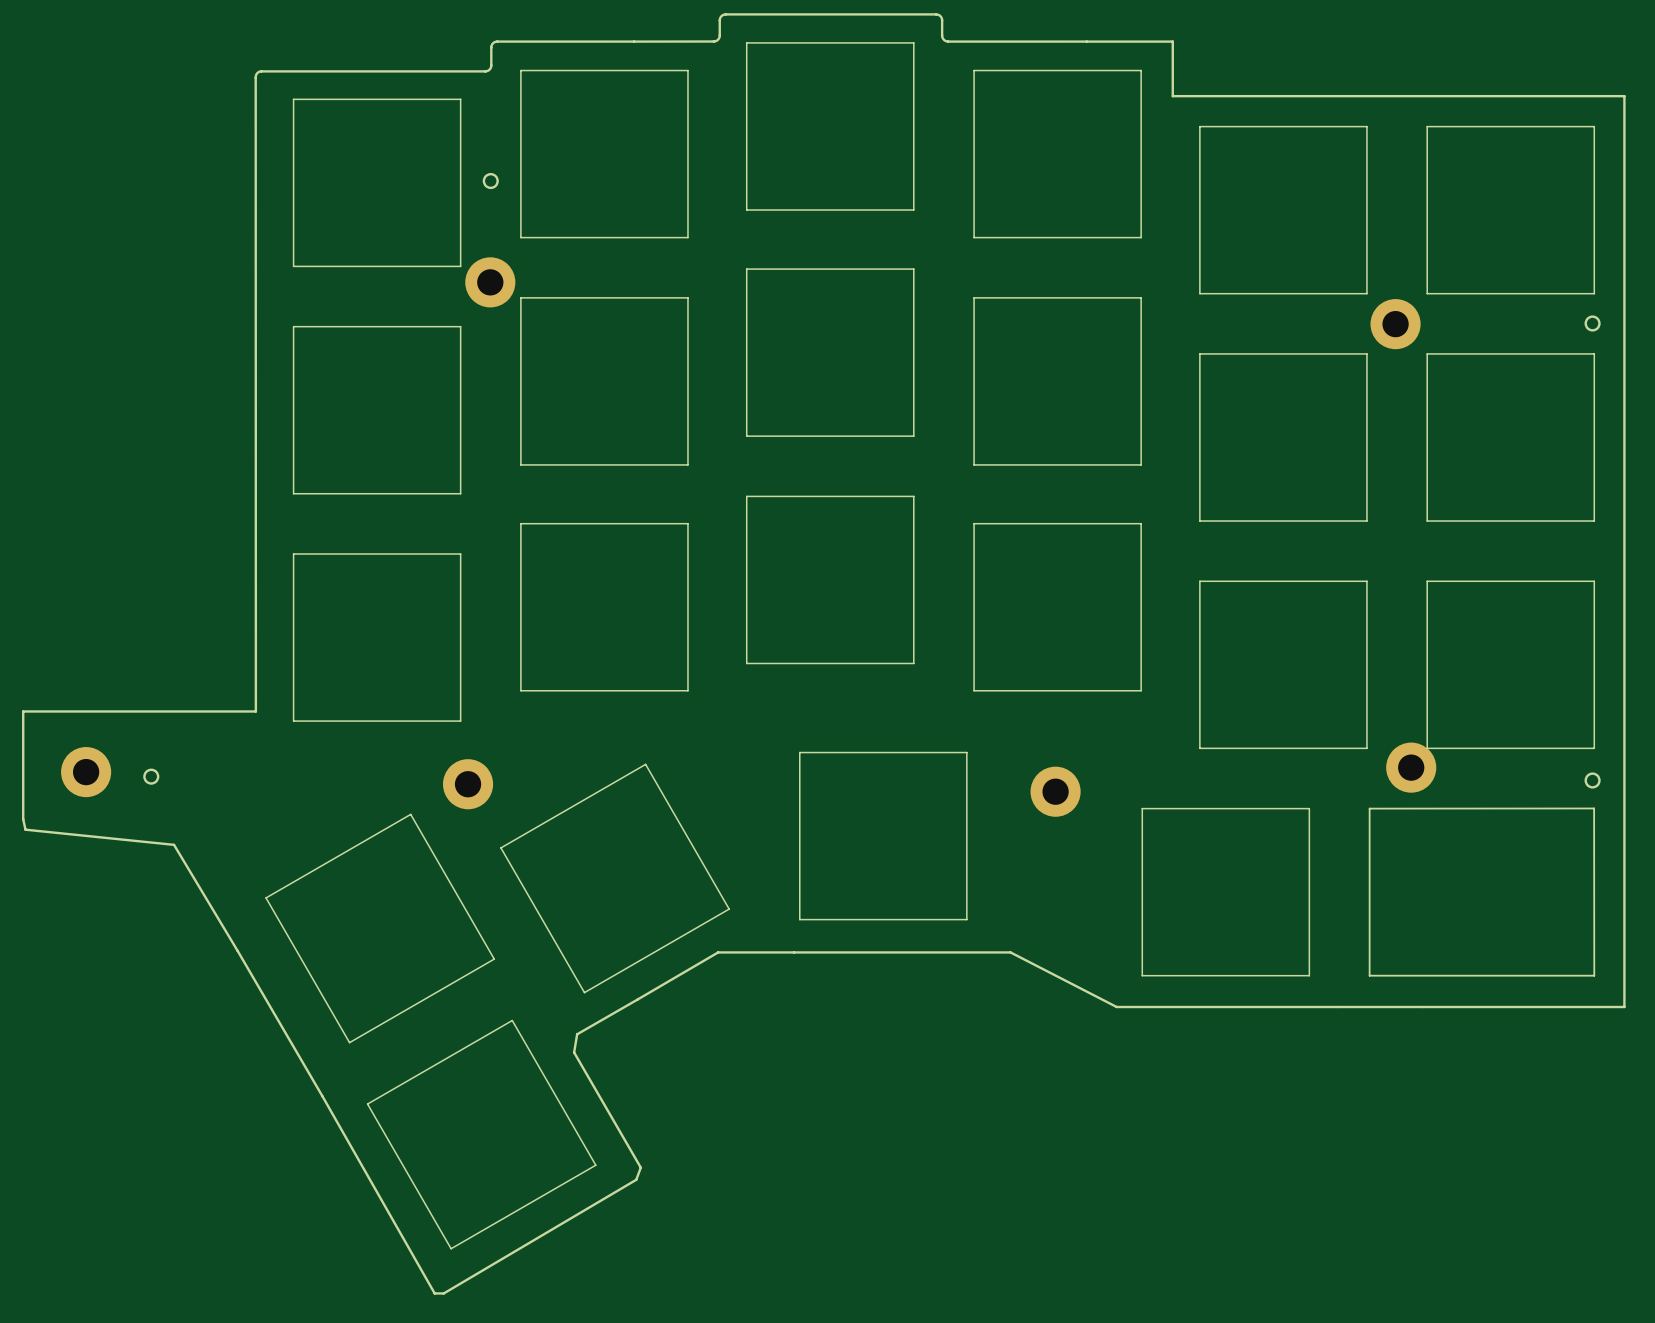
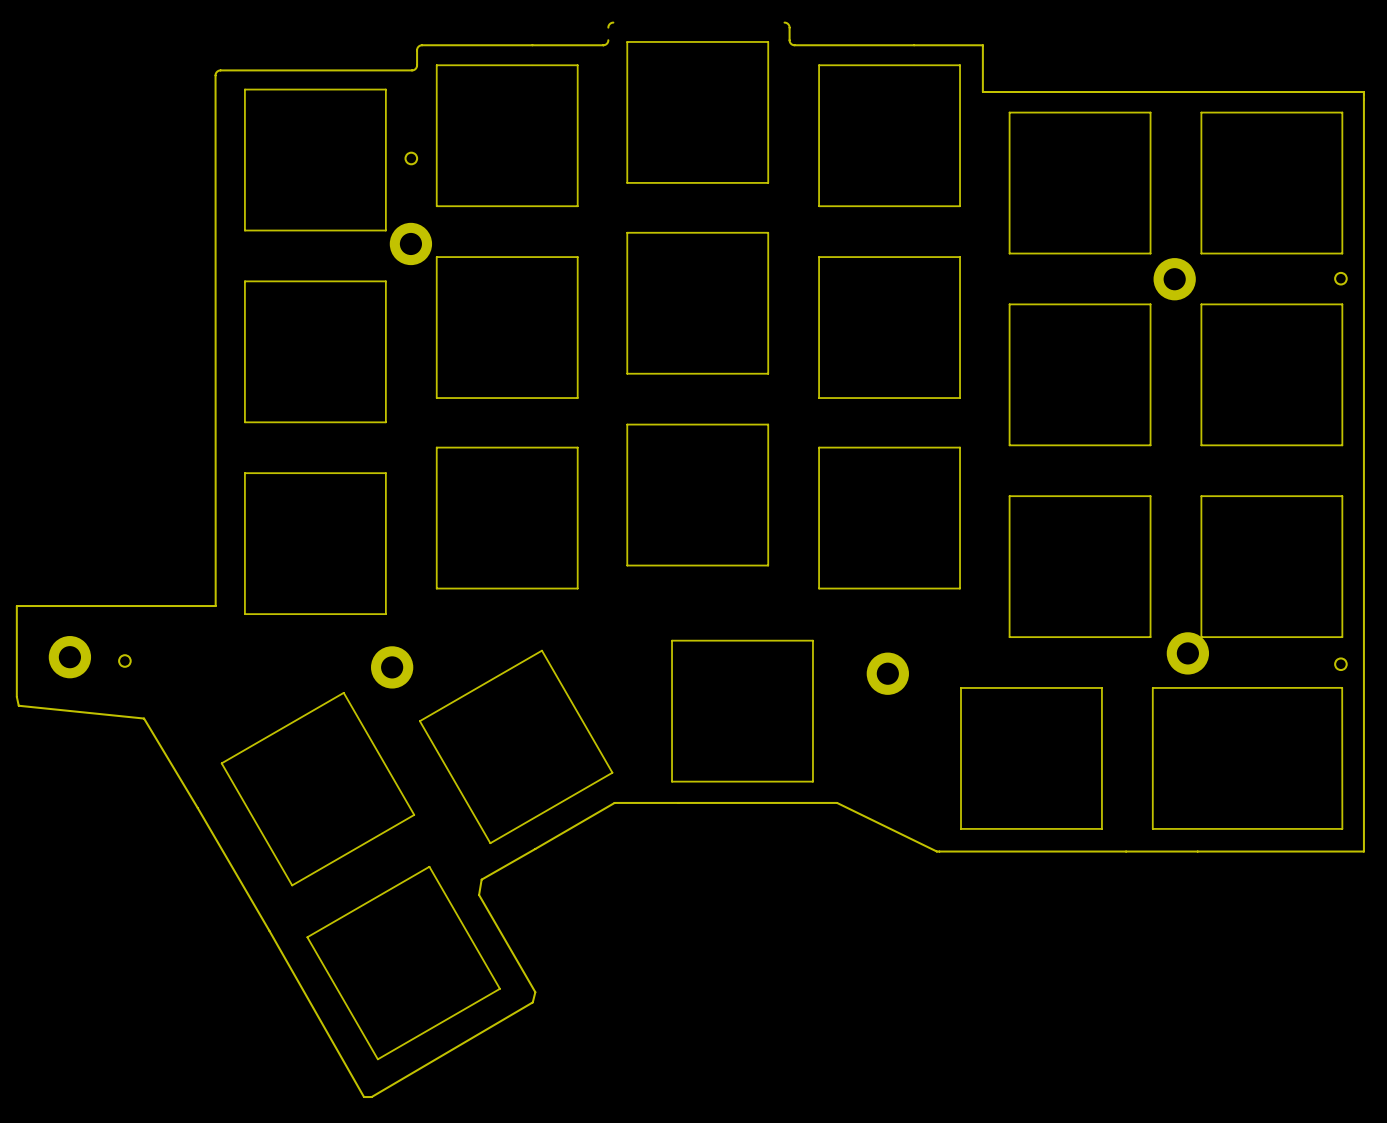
board edge: none -> (613, 22) (608, 27)
board edge: none -> (784, 22) (789, 26) (789, 42) (794, 45)
board edge: none -> (608, 40) (603, 45)
board edge: none -> (422, 45) (603, 45)
board edge: none -> (422, 45) (417, 49) (417, 65)
board edge: none -> (417, 65) (412, 70)
board edge: none -> (412, 70) (220, 70) (215, 73) (215, 606) (213, 606)
board edge: (255, 711) (255, 77) (259, 71) (485, 71) (491, 67) (491, 46) (496, 41) (714, 41) (719, 37) (720, 18) (725, 14) (936, 14) (941, 18) (942, 36) (947, 41) (1172, 41) (1172, 96) (1624, 96) (1624, 1007) (1116, 1007) (1010, 952) (718, 952) (577, 1034) (574, 1052) (640, 1167) (636, 1179) (443, 1293) -> (794, 45) (982, 45) (982, 91) (1363, 92) (1363, 851) (936, 851) (837, 802) (614, 802) (481, 879) (479, 895) (535, 992) (532, 1002) (371, 1097)

